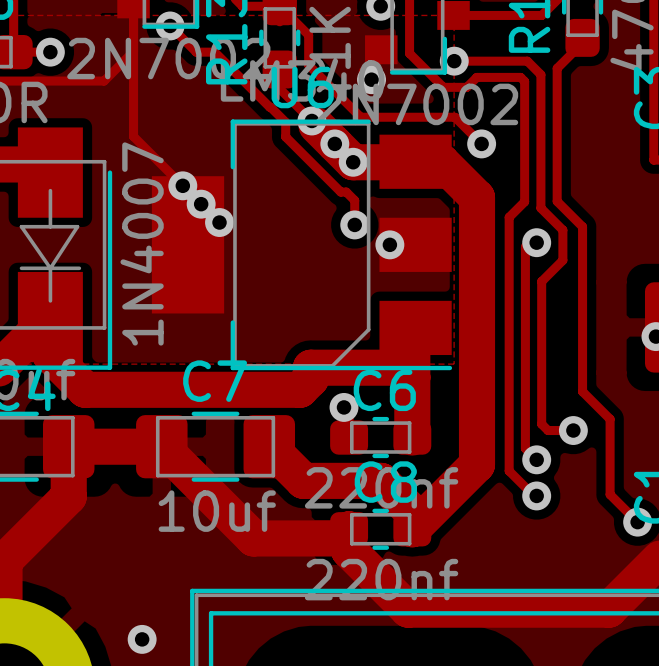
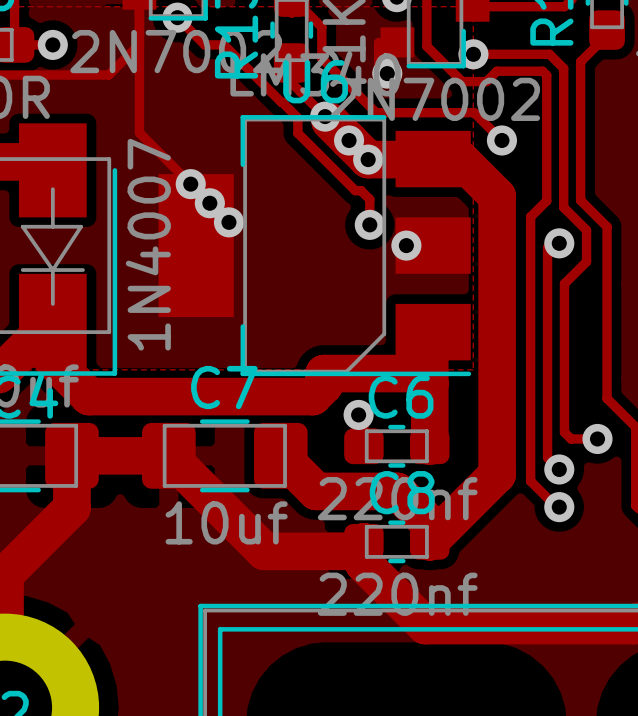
track: none -> (378, 42) (378, 64)
via: (142, 639) -> none

